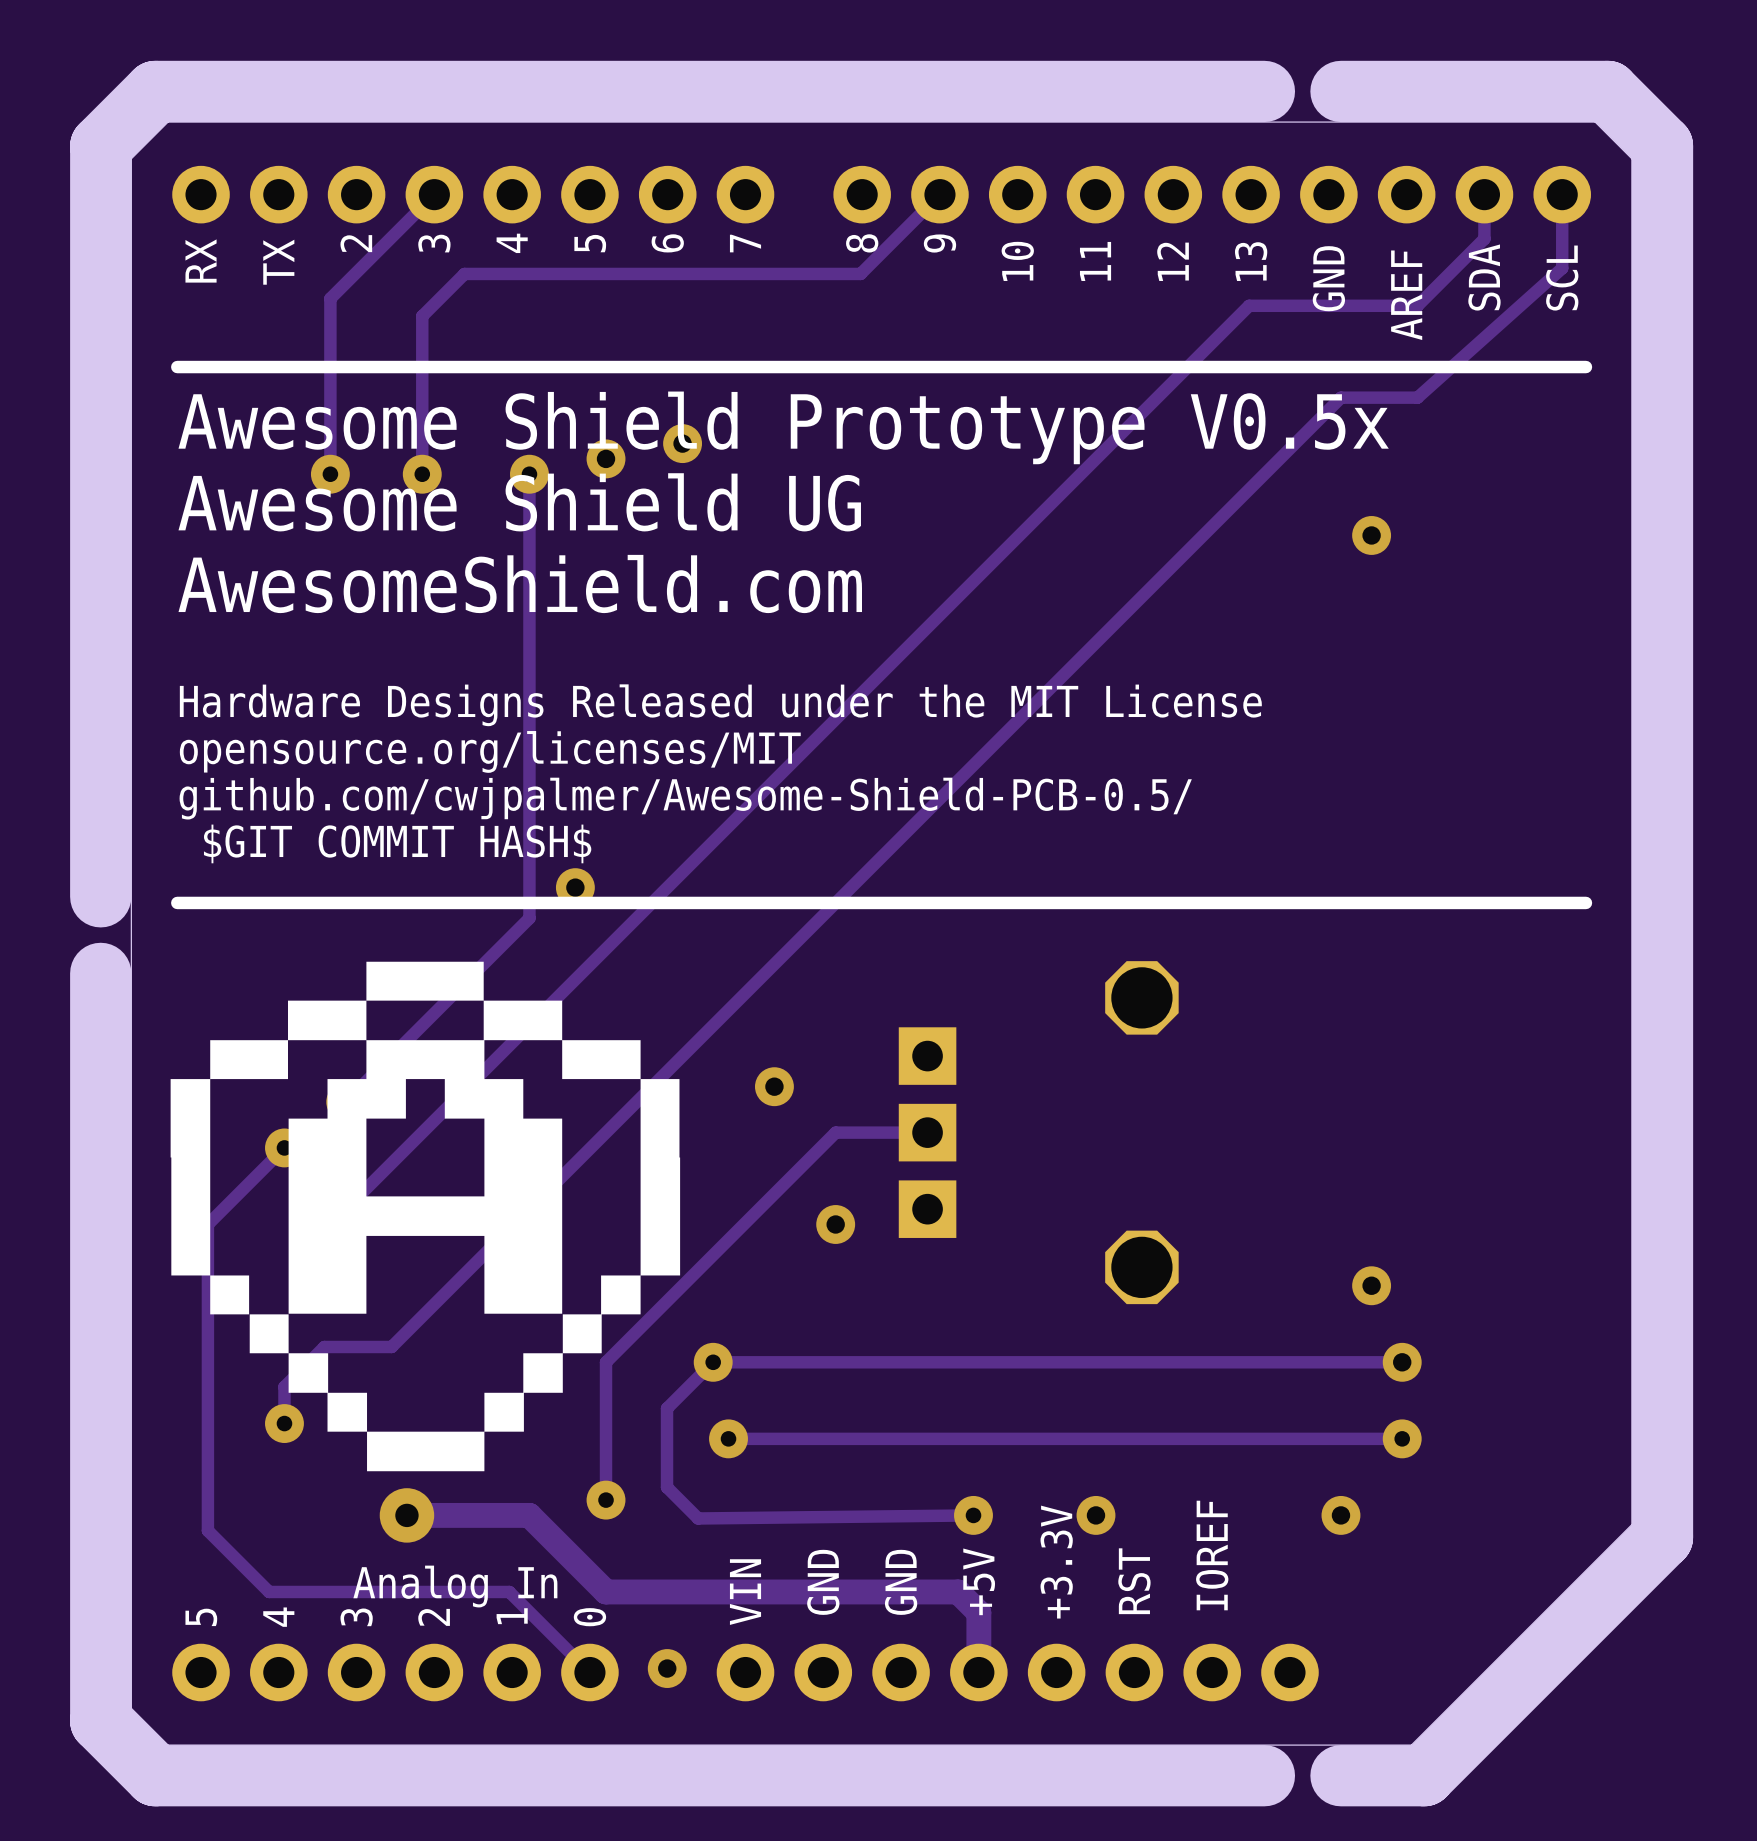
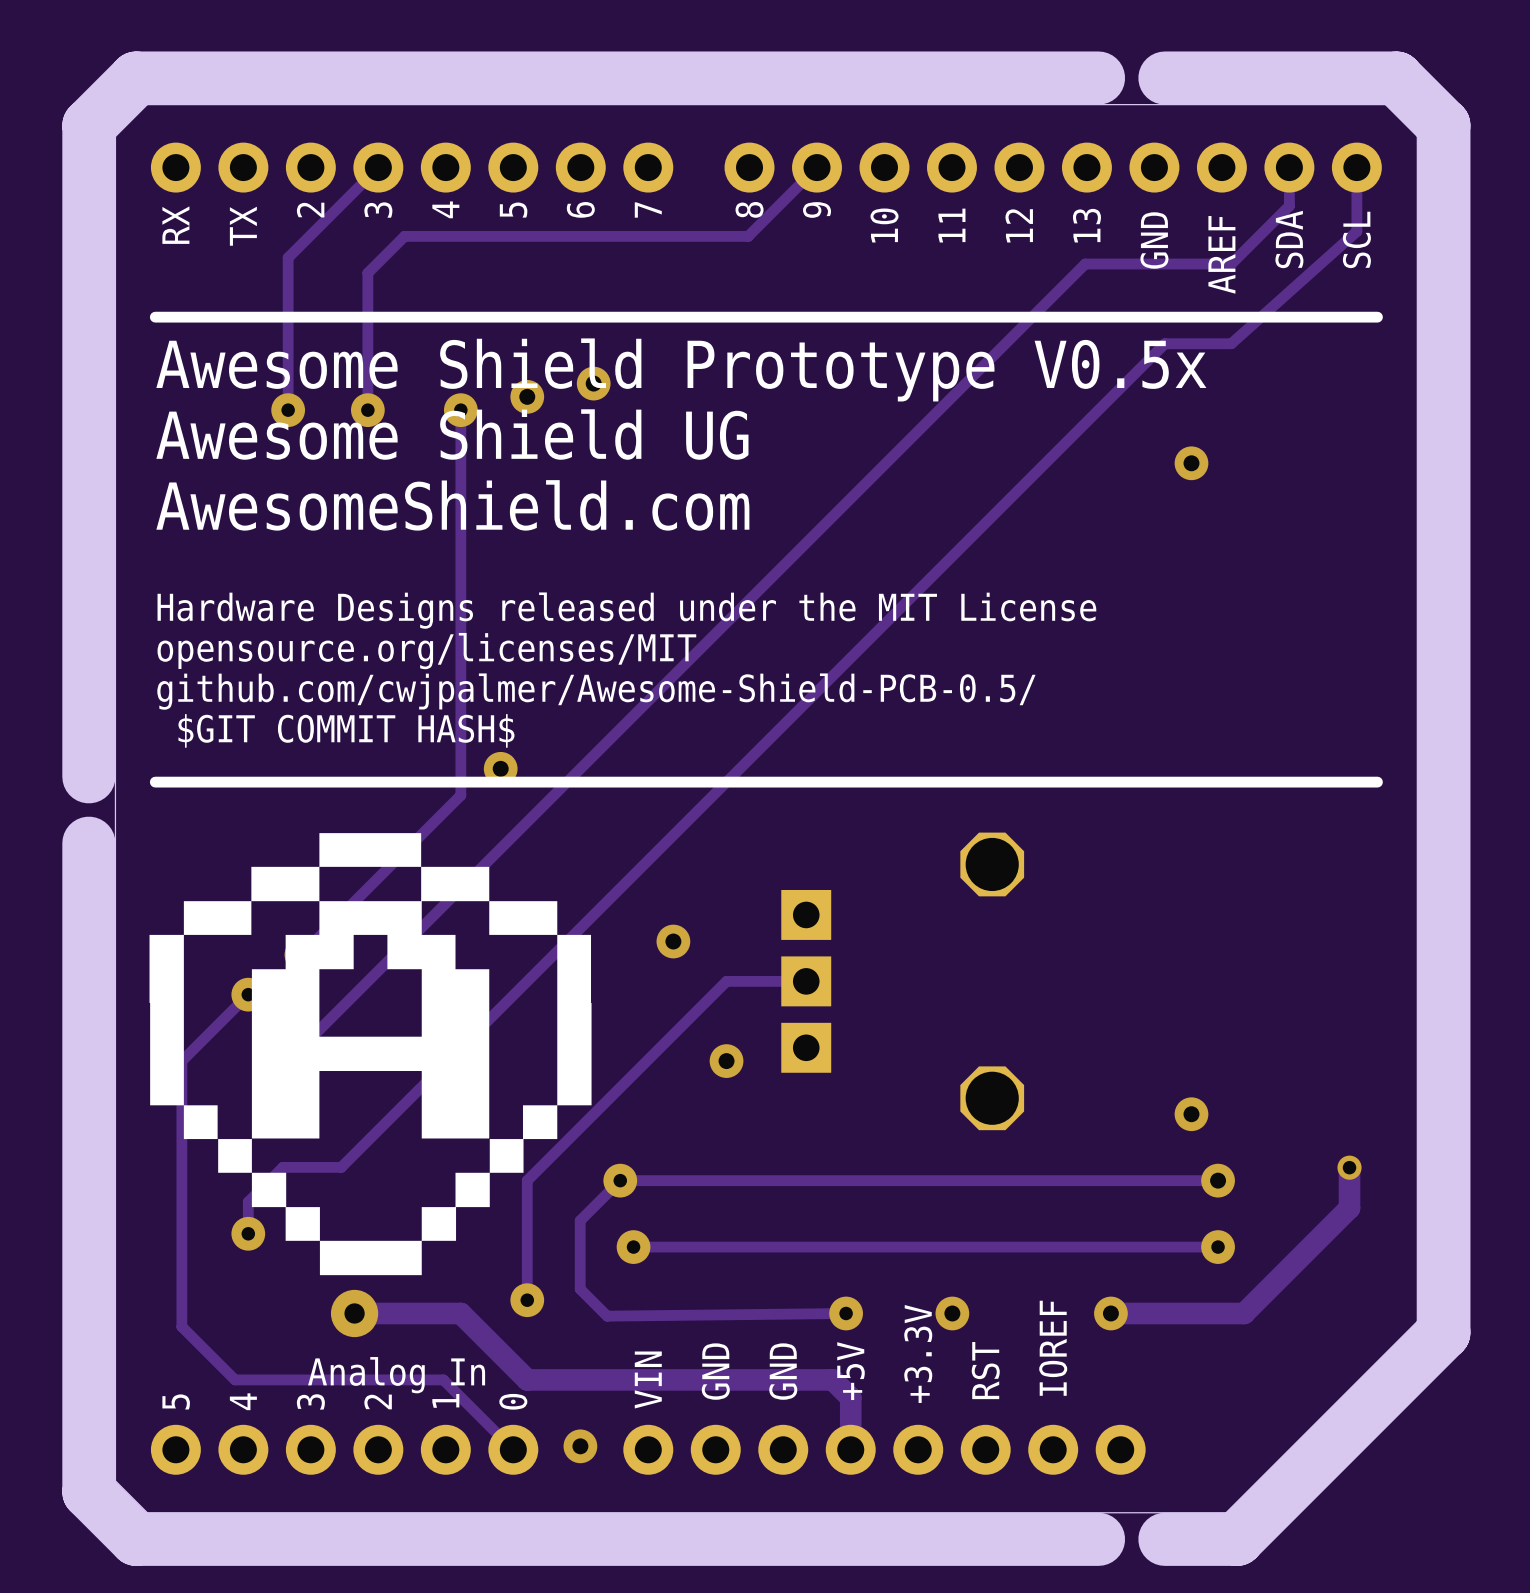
text: Hardware Designs Released under the MIT License (720, 705) -> Hardware Designs released under the MIT License (626, 610)
track: none -> (1349, 1167) (1349, 1208) (1244, 1313) (1110, 1313)
via: none -> (1349, 1167)
via position: (1340, 1515) -> (1110, 1313)

